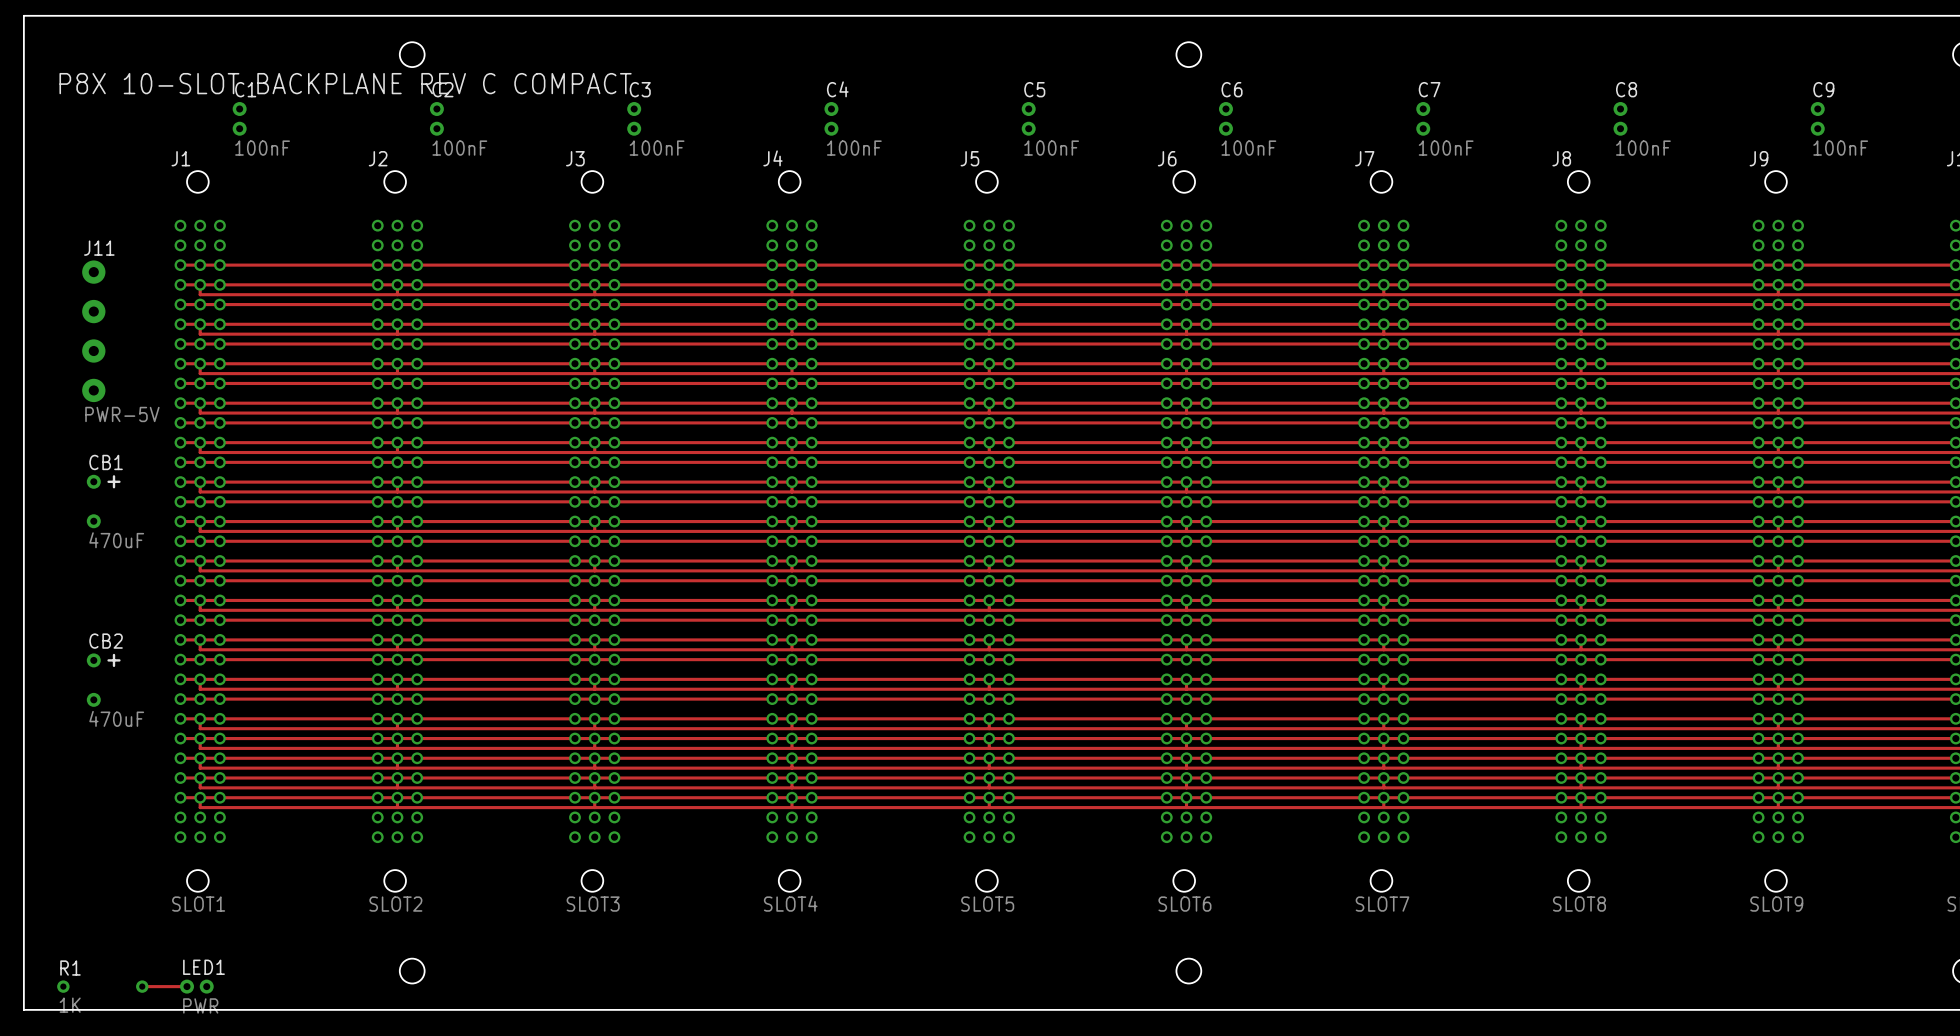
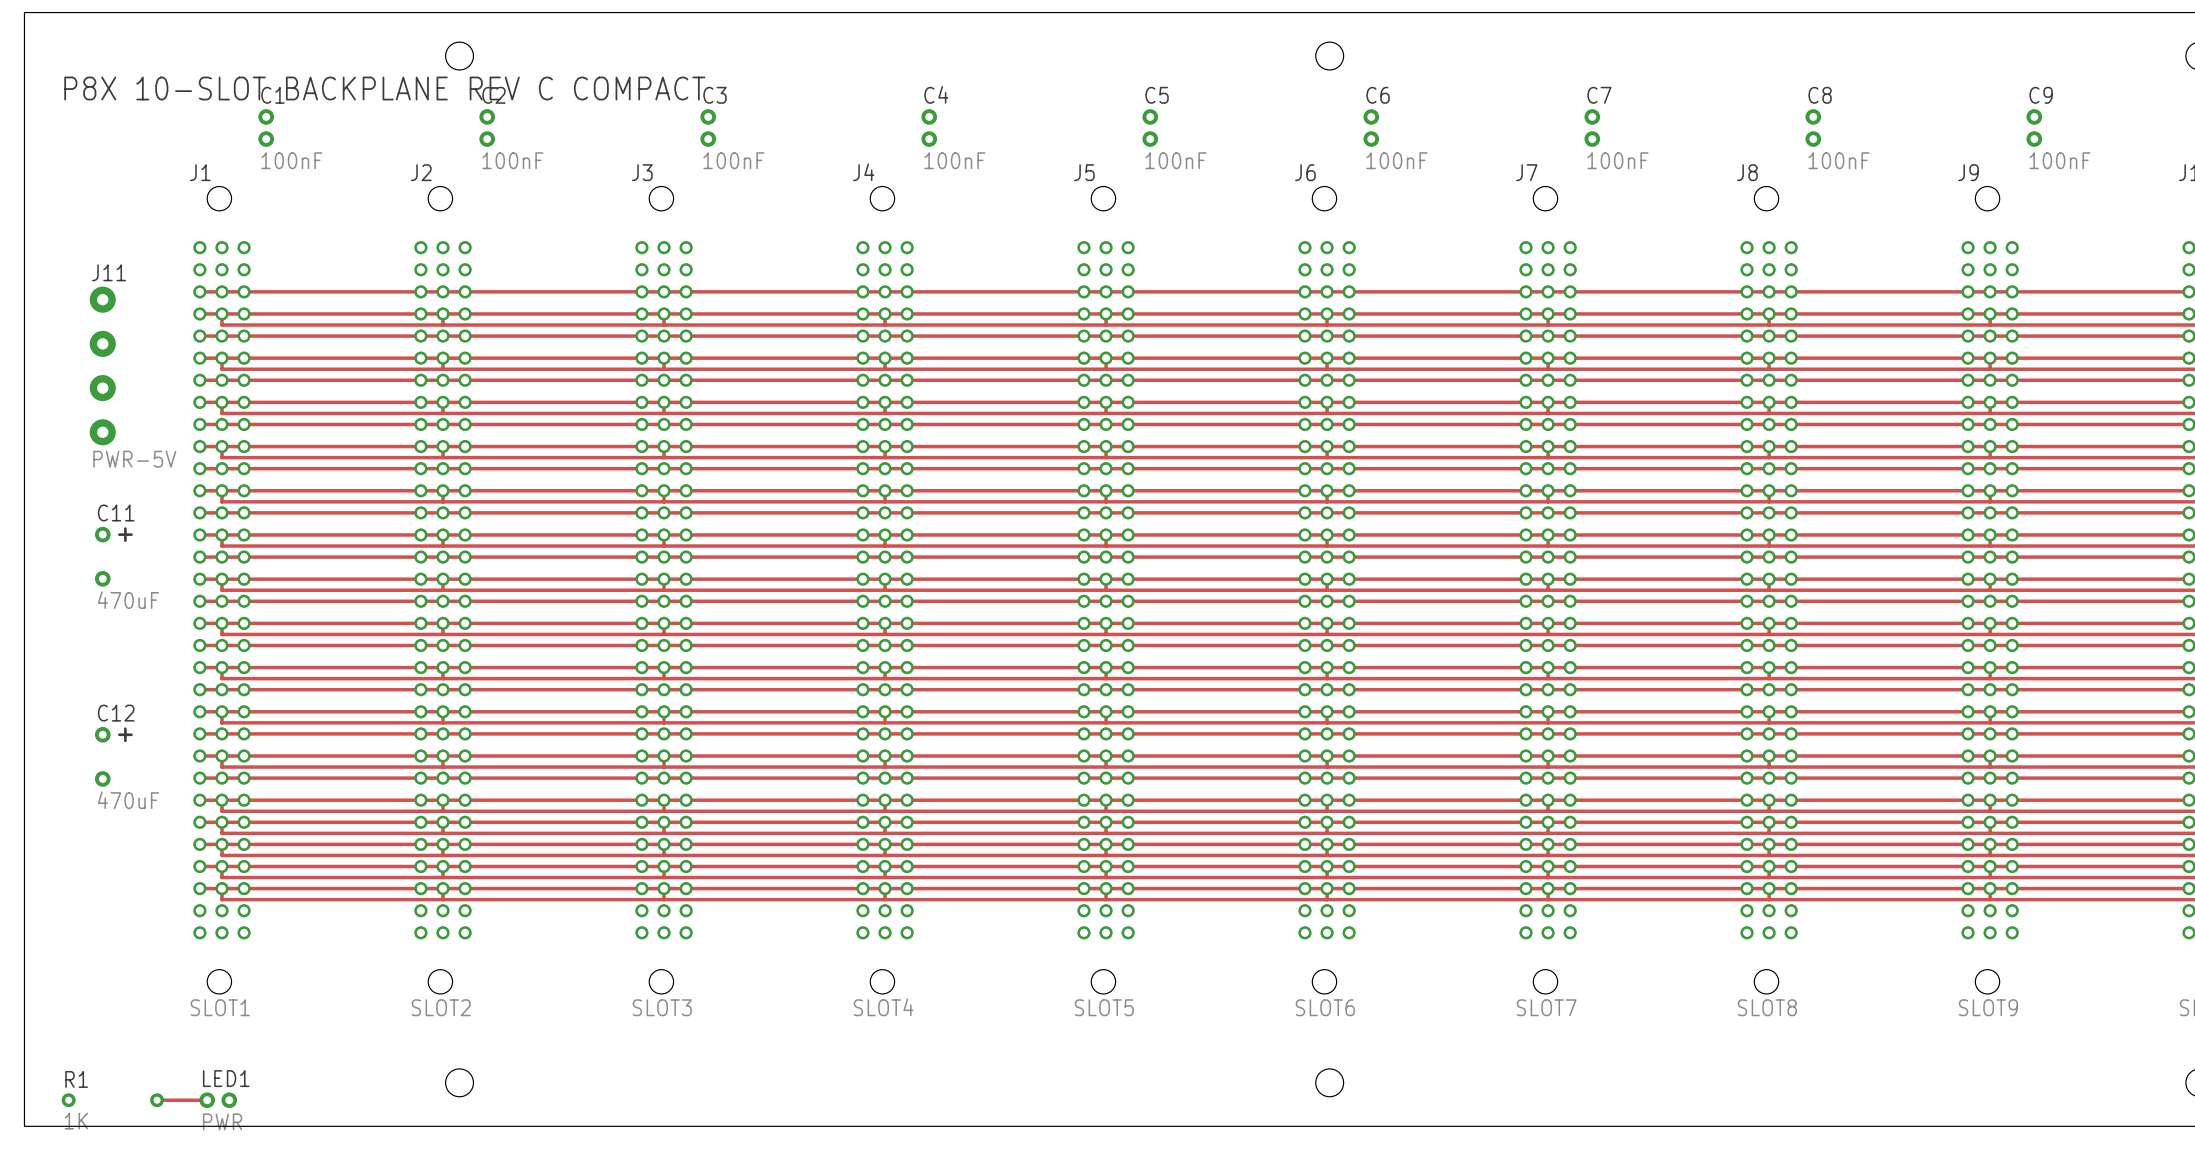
CB1 name: CB1 (106, 462) -> C11 (116, 512)
CB2 name: CB2 (106, 641) -> C12 (116, 713)

